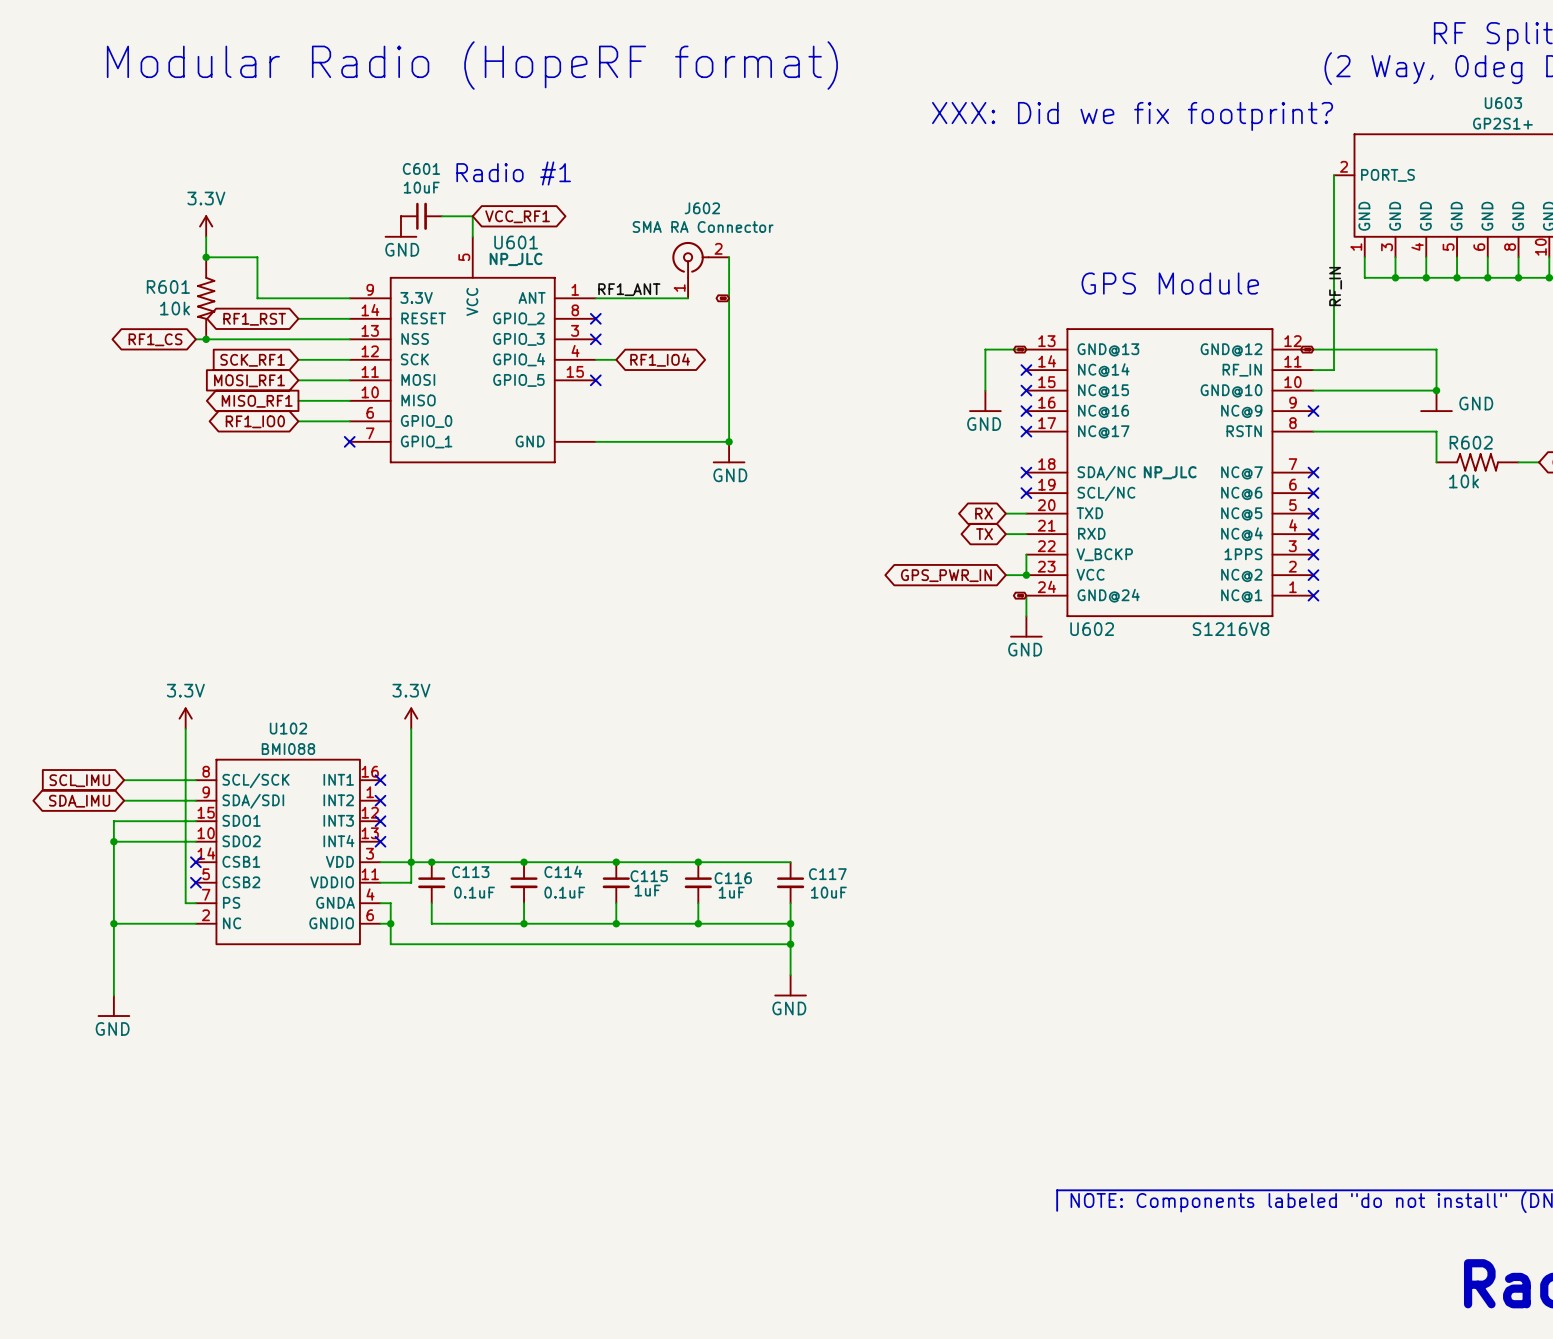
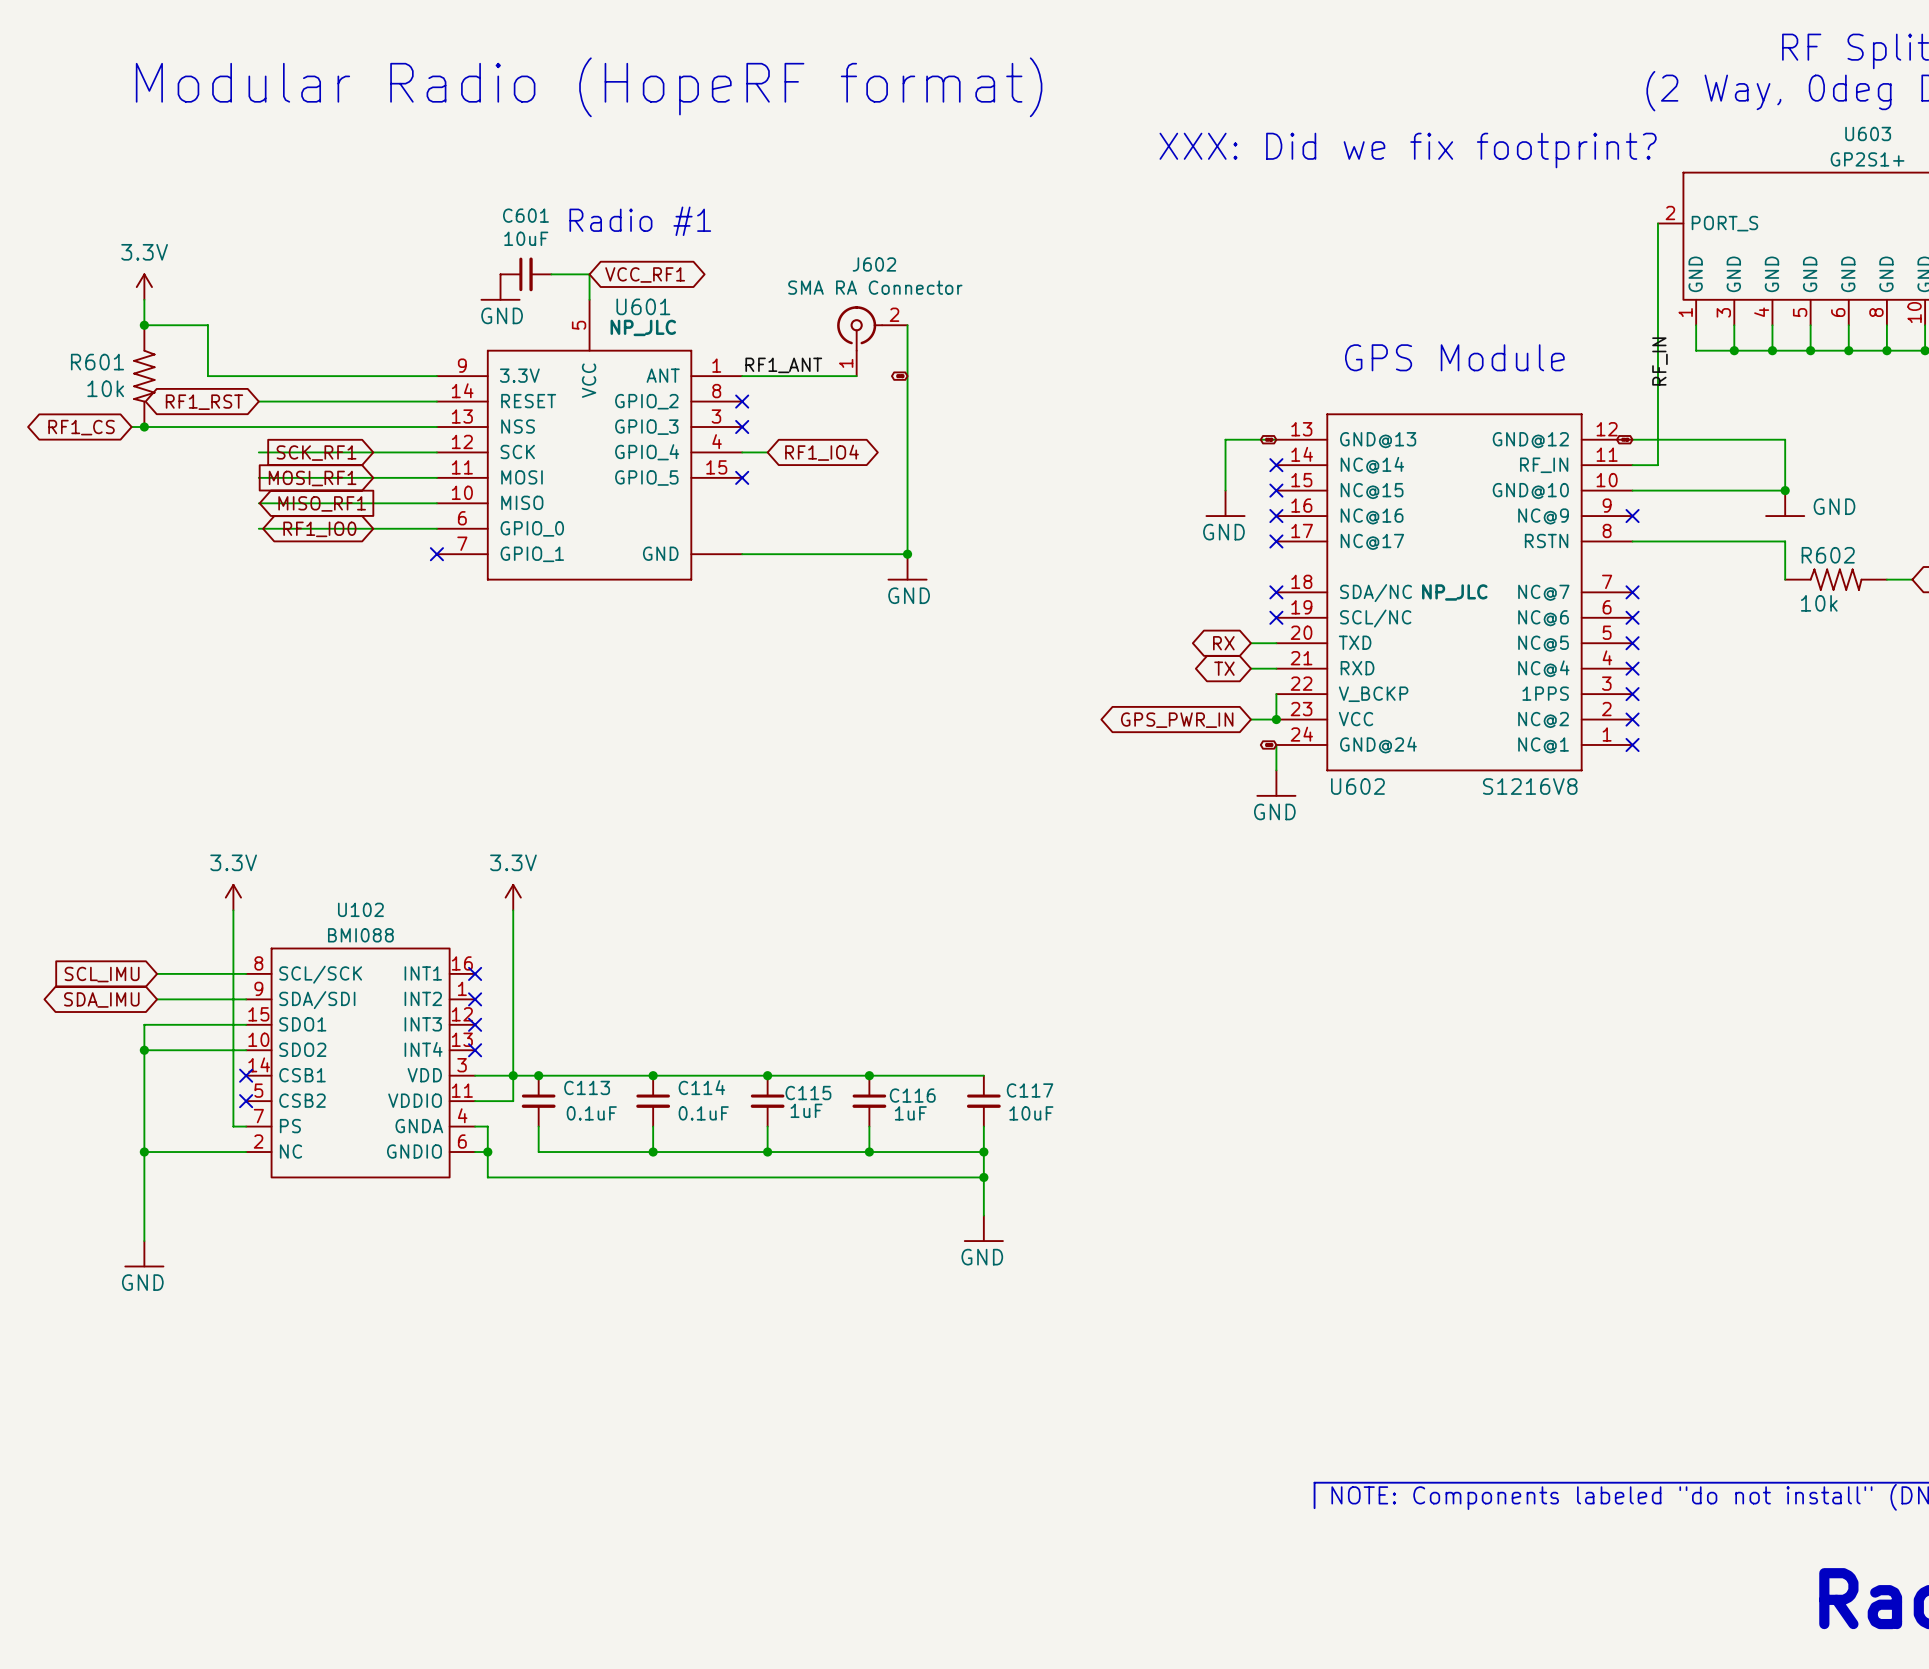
power symbol position: 3.3V (206, 226) -> 3.3V (144, 287)
wire: (206, 236) (206, 257) (257, 257) (257, 298) -> (144, 299) (144, 325) (207, 325) (207, 376) (322, 376)
junction: none -> (144, 325)
junction: (206, 257) -> none
R601 position: (206, 298) -> (144, 376)
wire: none -> (258, 401) (373, 401)
global label position: RF1_RST (254, 319) -> RF1_RST (204, 402)
wire: none -> (131, 427) (246, 427)
junction: none -> (144, 427)
global label position: RF1_CS (155, 339) -> RF1_CS (81, 427)
junction: (206, 339) -> none
wire: none -> (258, 452) (373, 452)
wire: none -> (258, 477) (373, 477)
wire: none -> (258, 503) (373, 503)
wire: none -> (258, 528) (373, 528)

